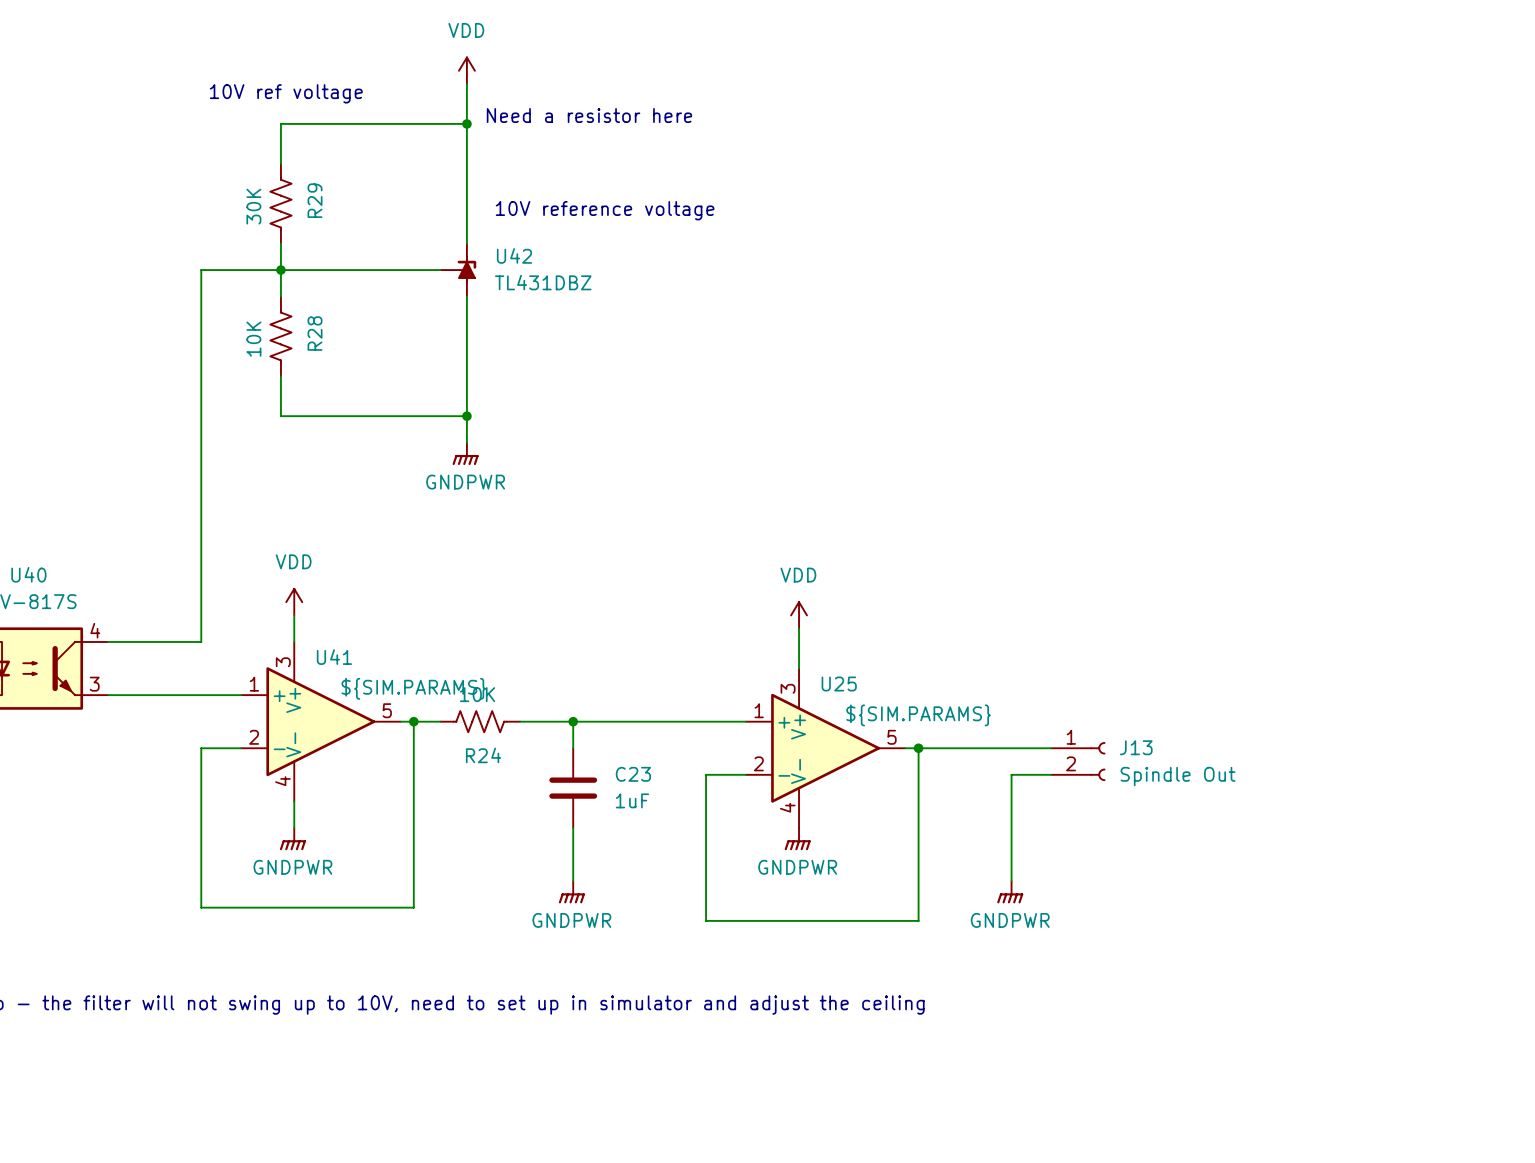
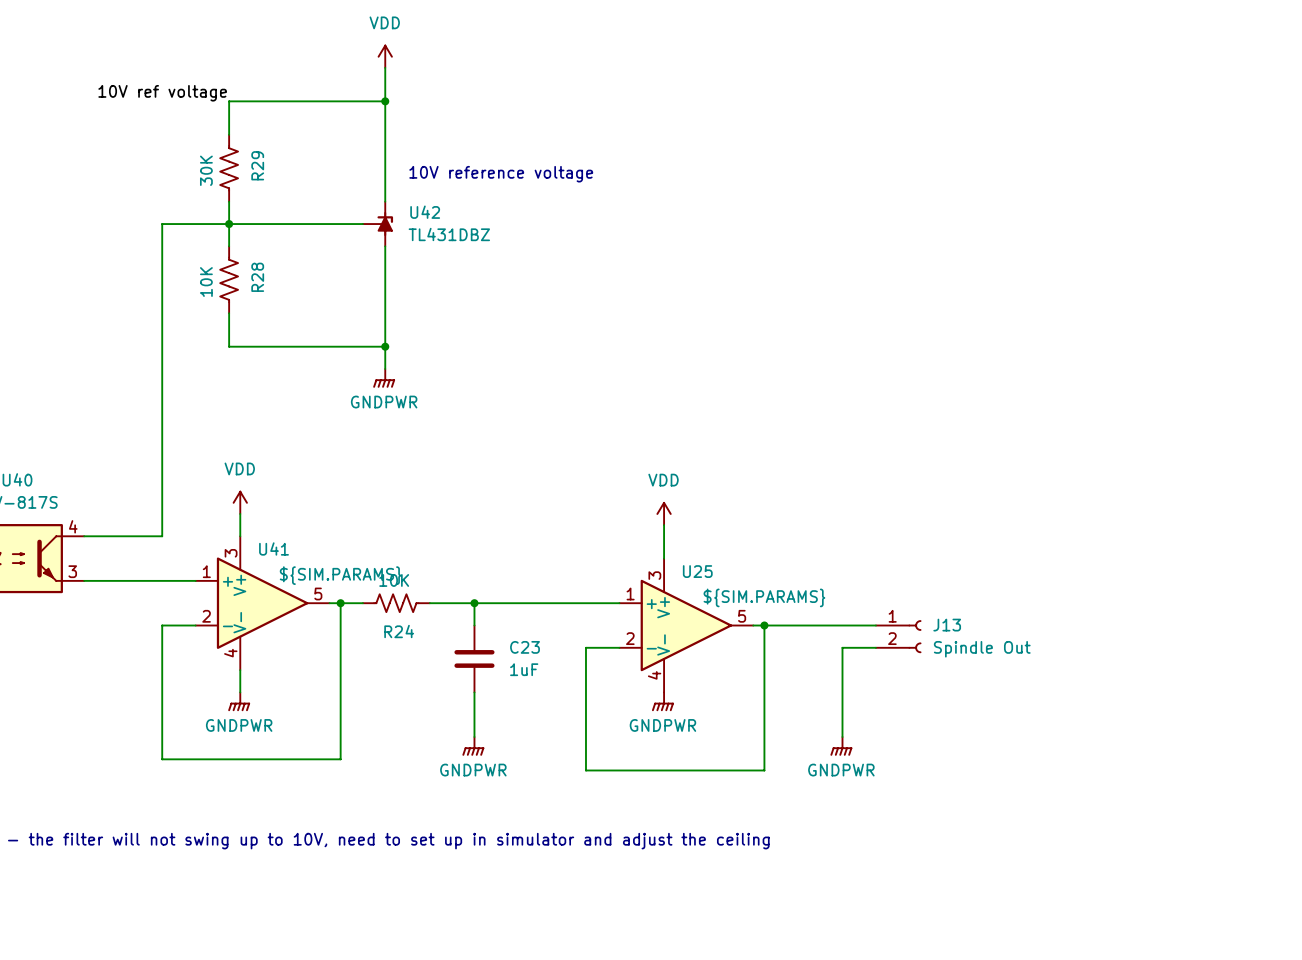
text: 10V ref voltage (286, 93) -> none
label: none -> 10V ref voltage (162, 93)
text: Need a resistor here (589, 115) -> none

